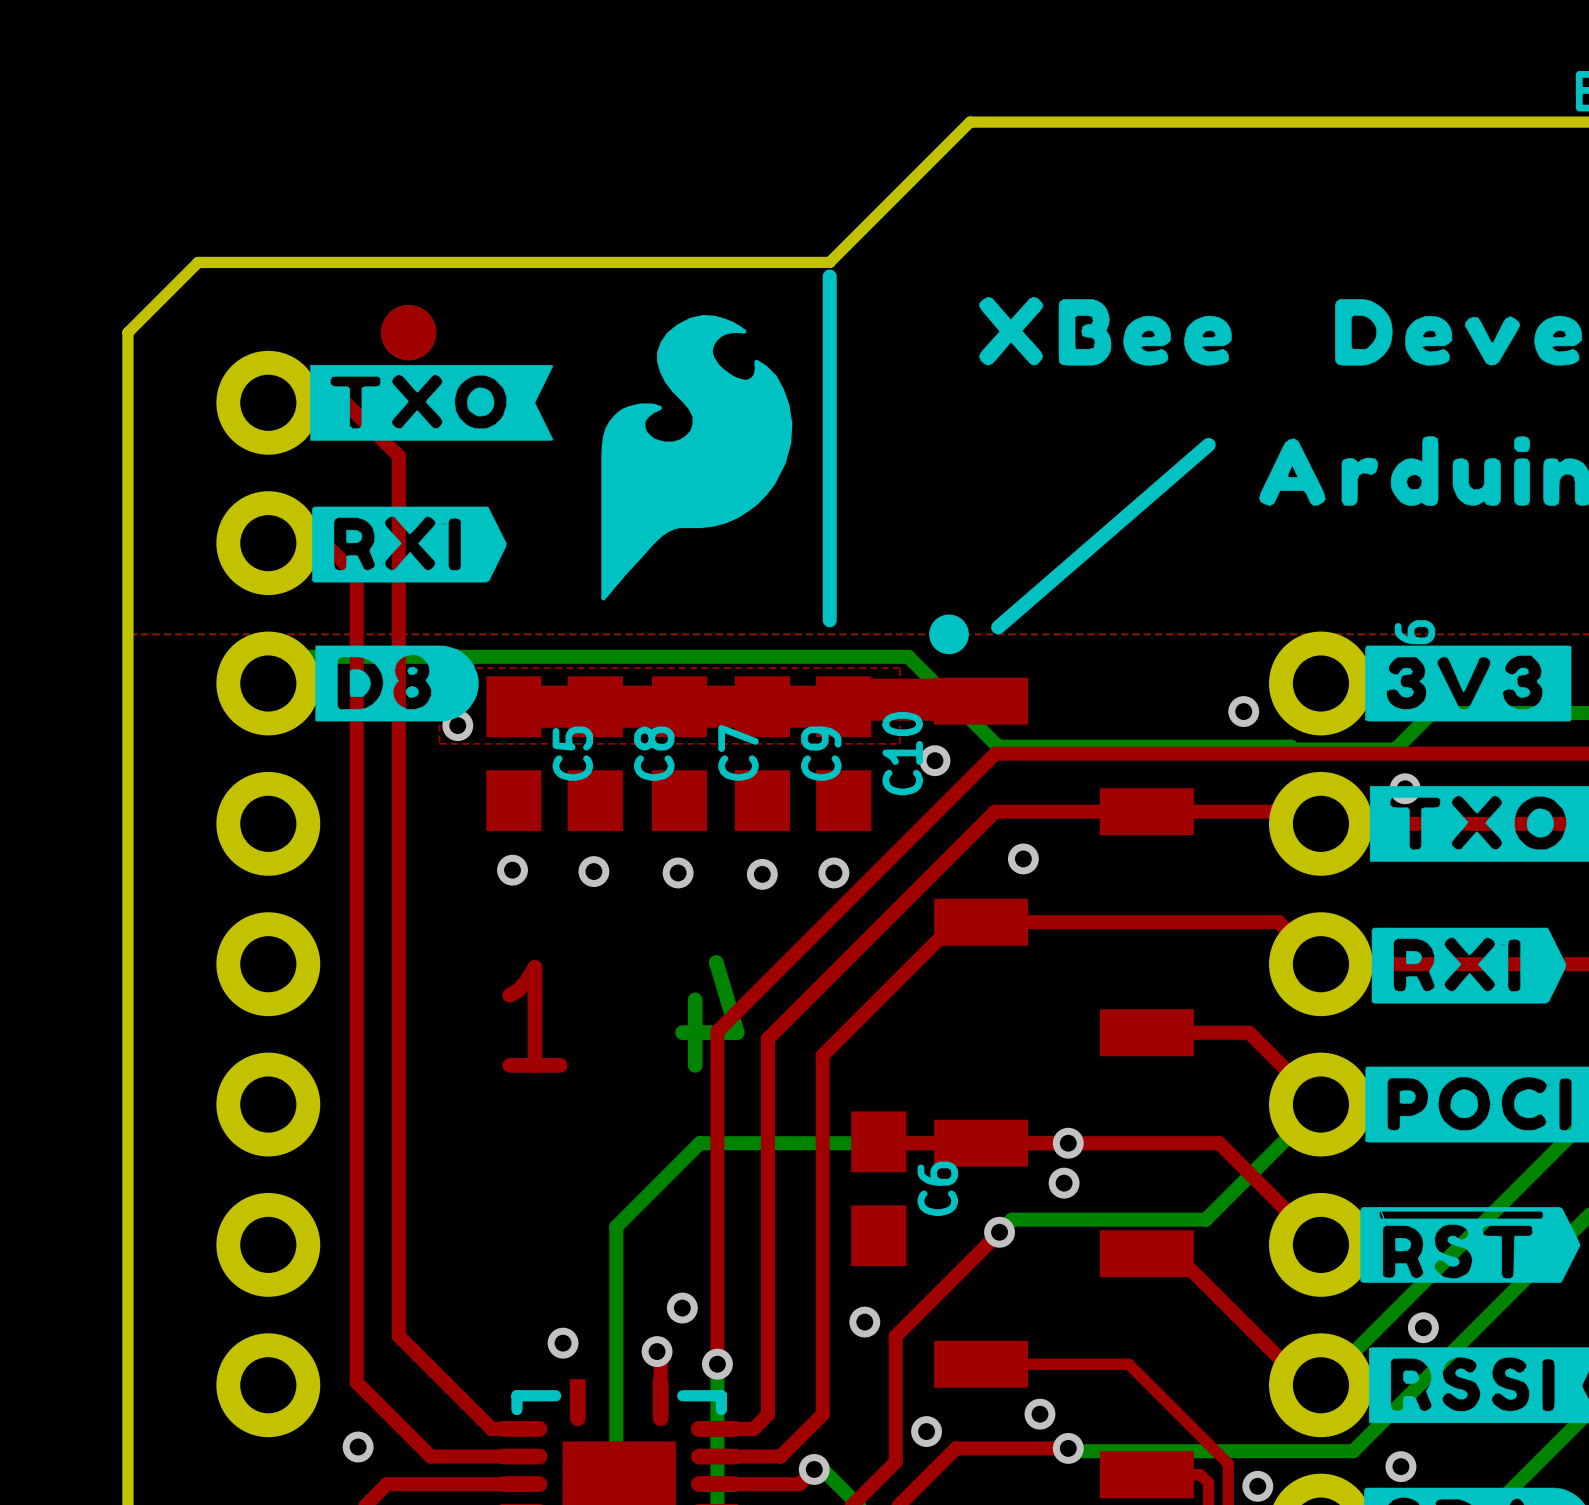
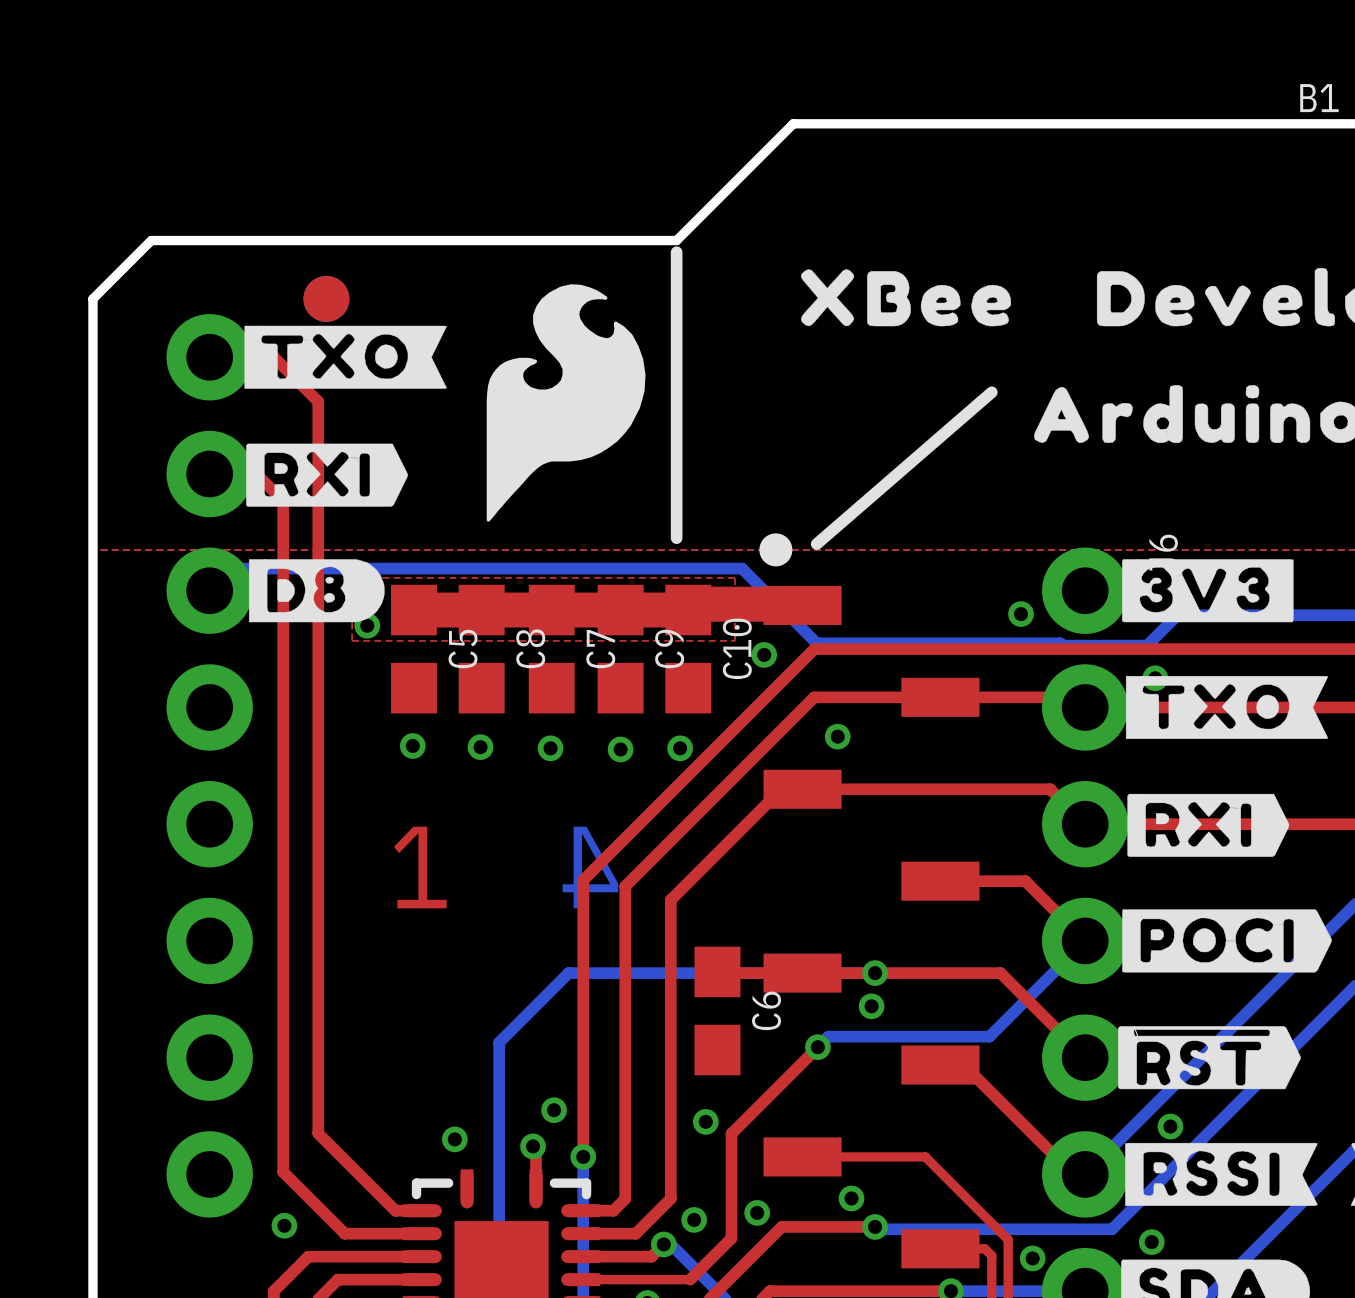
via: none -> (694, 1219)

